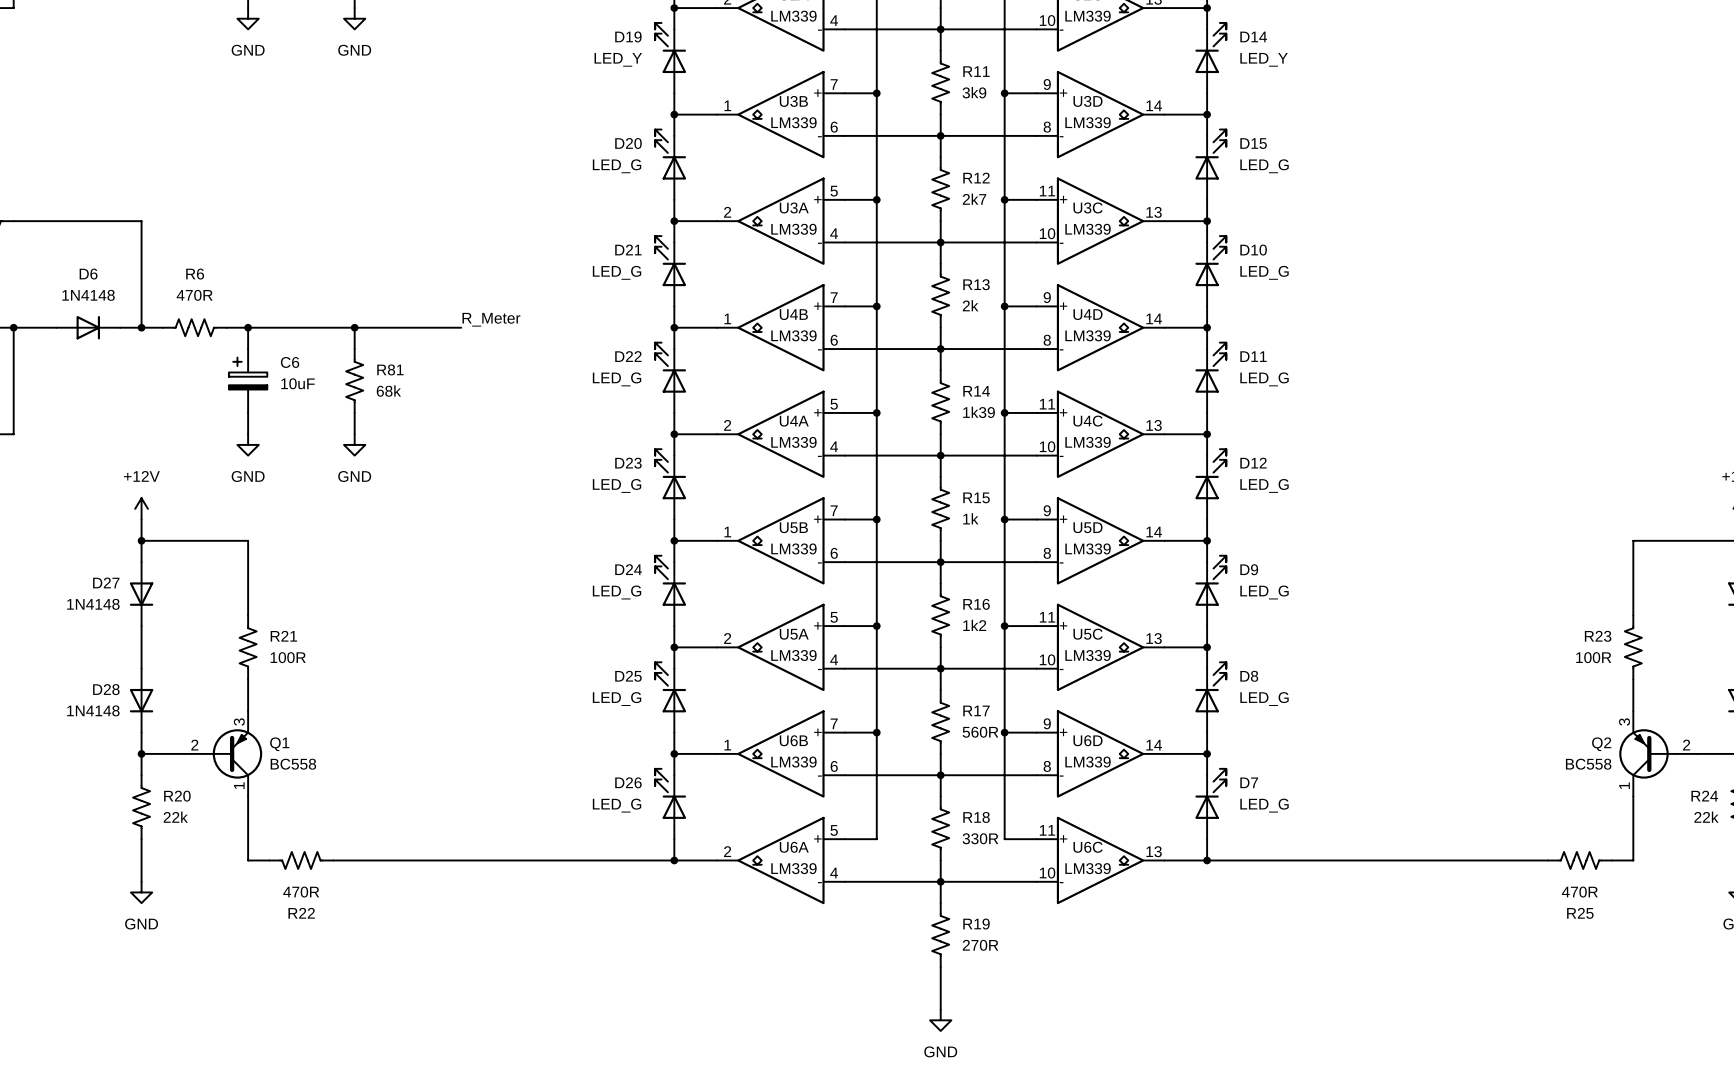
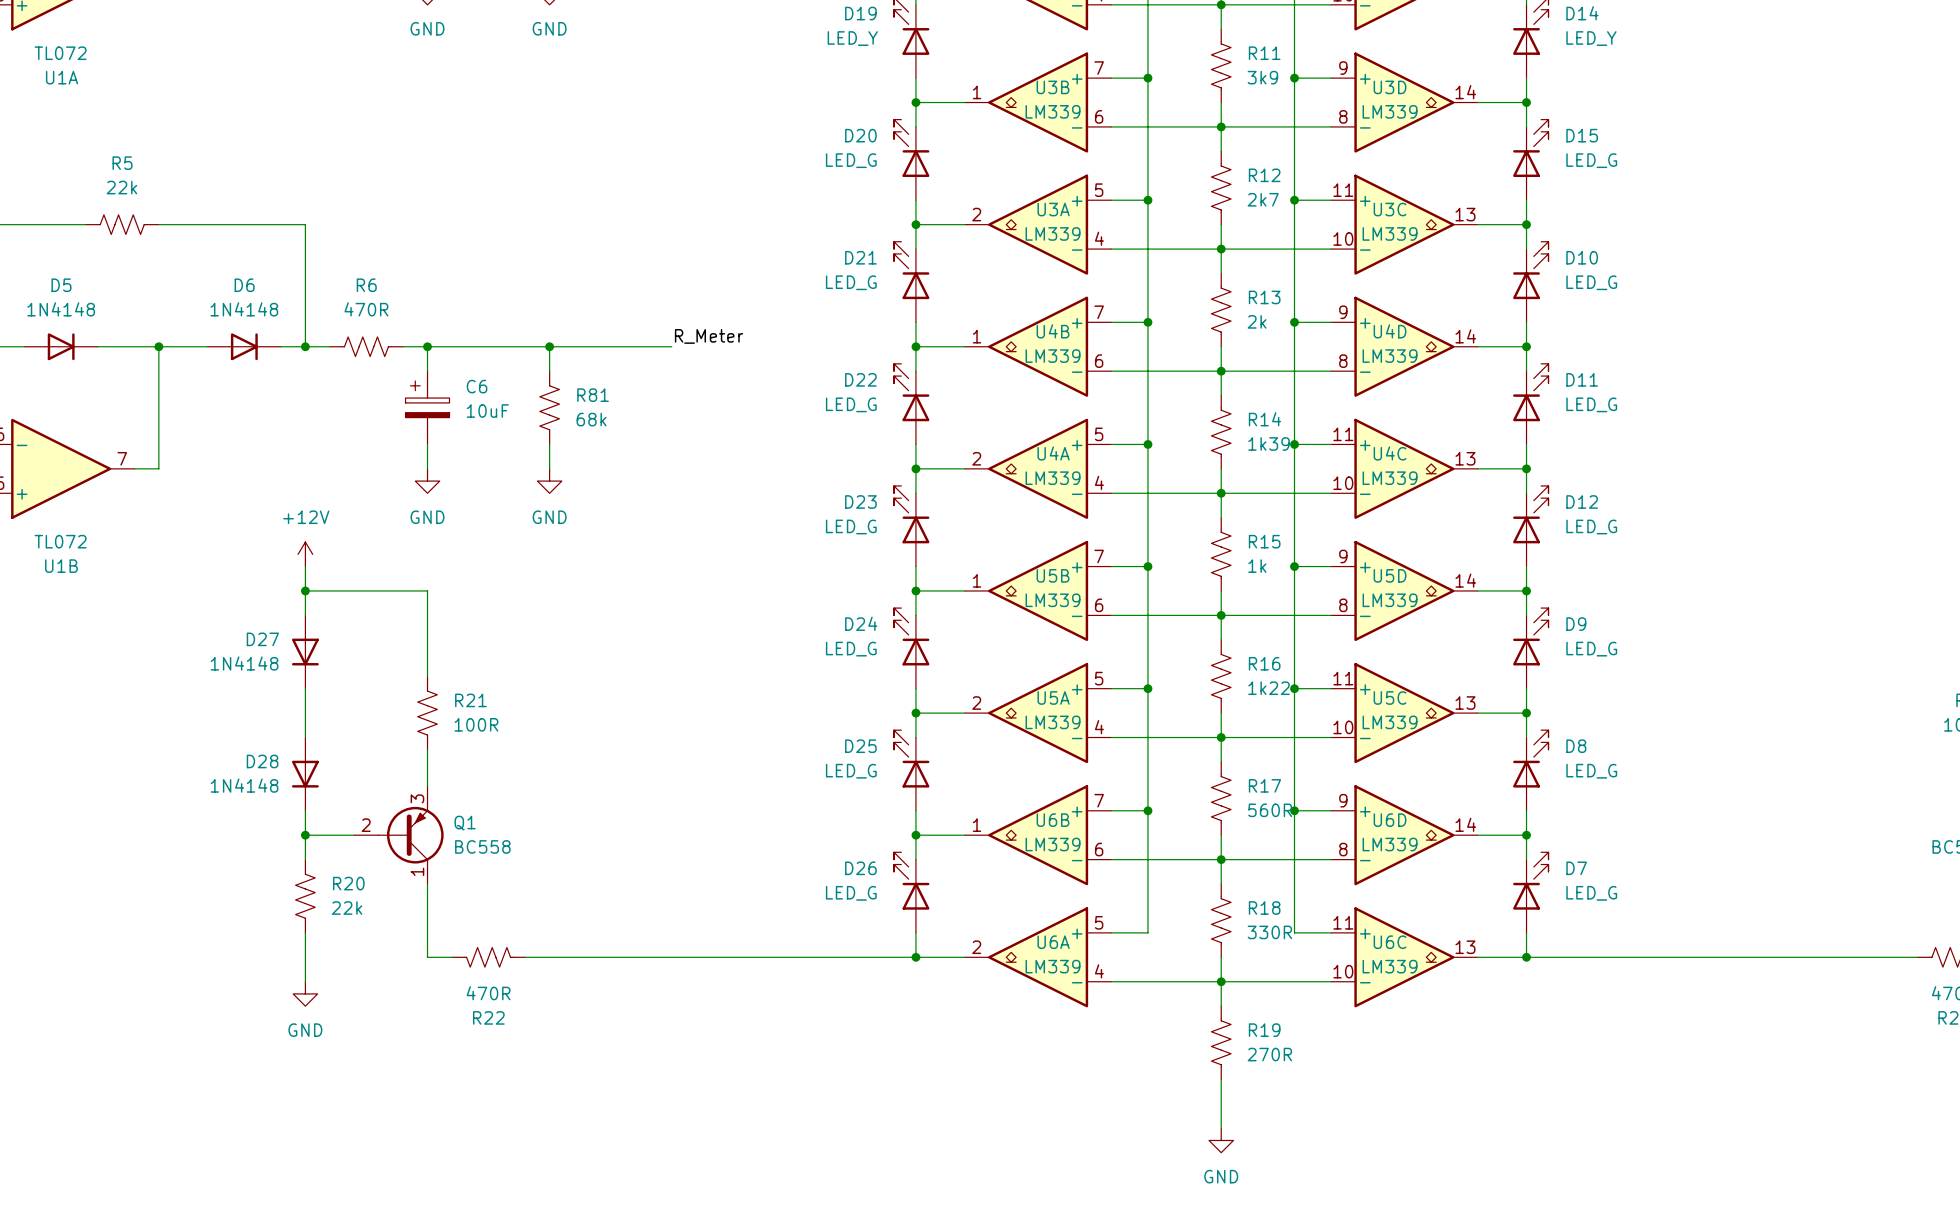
R16 value: 1k2 (974, 625) -> 1k22 (1269, 688)

